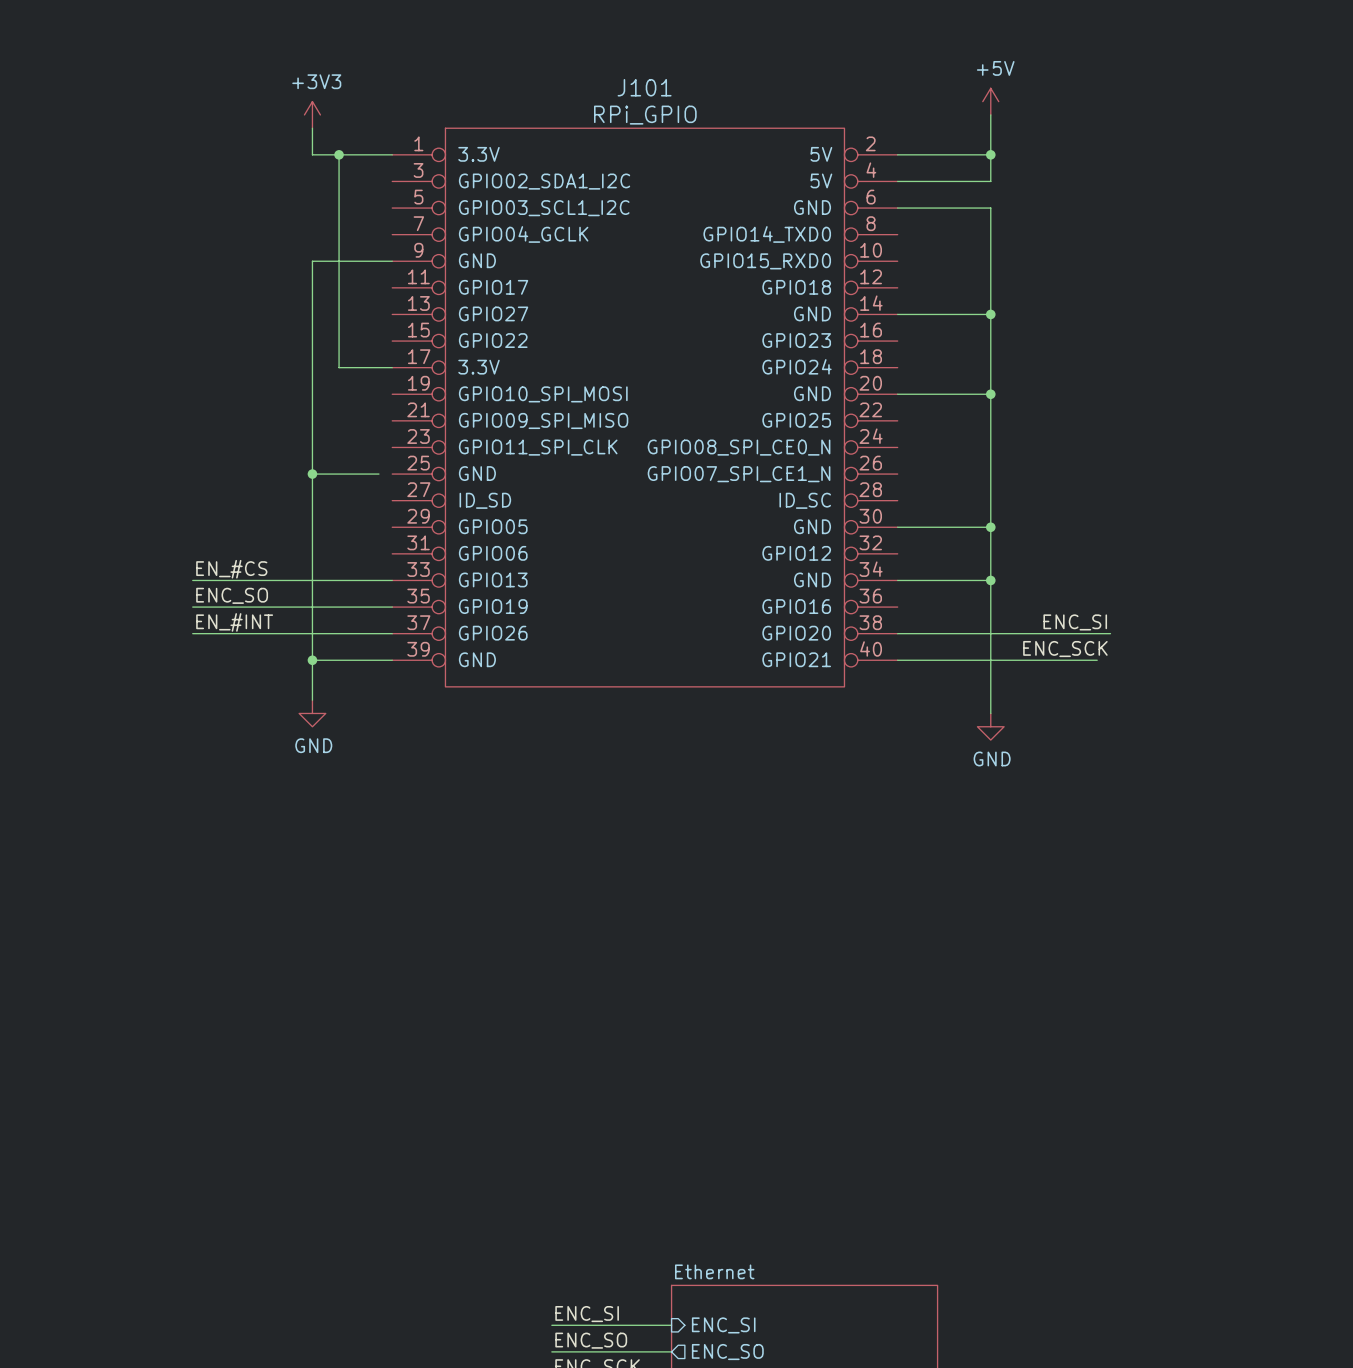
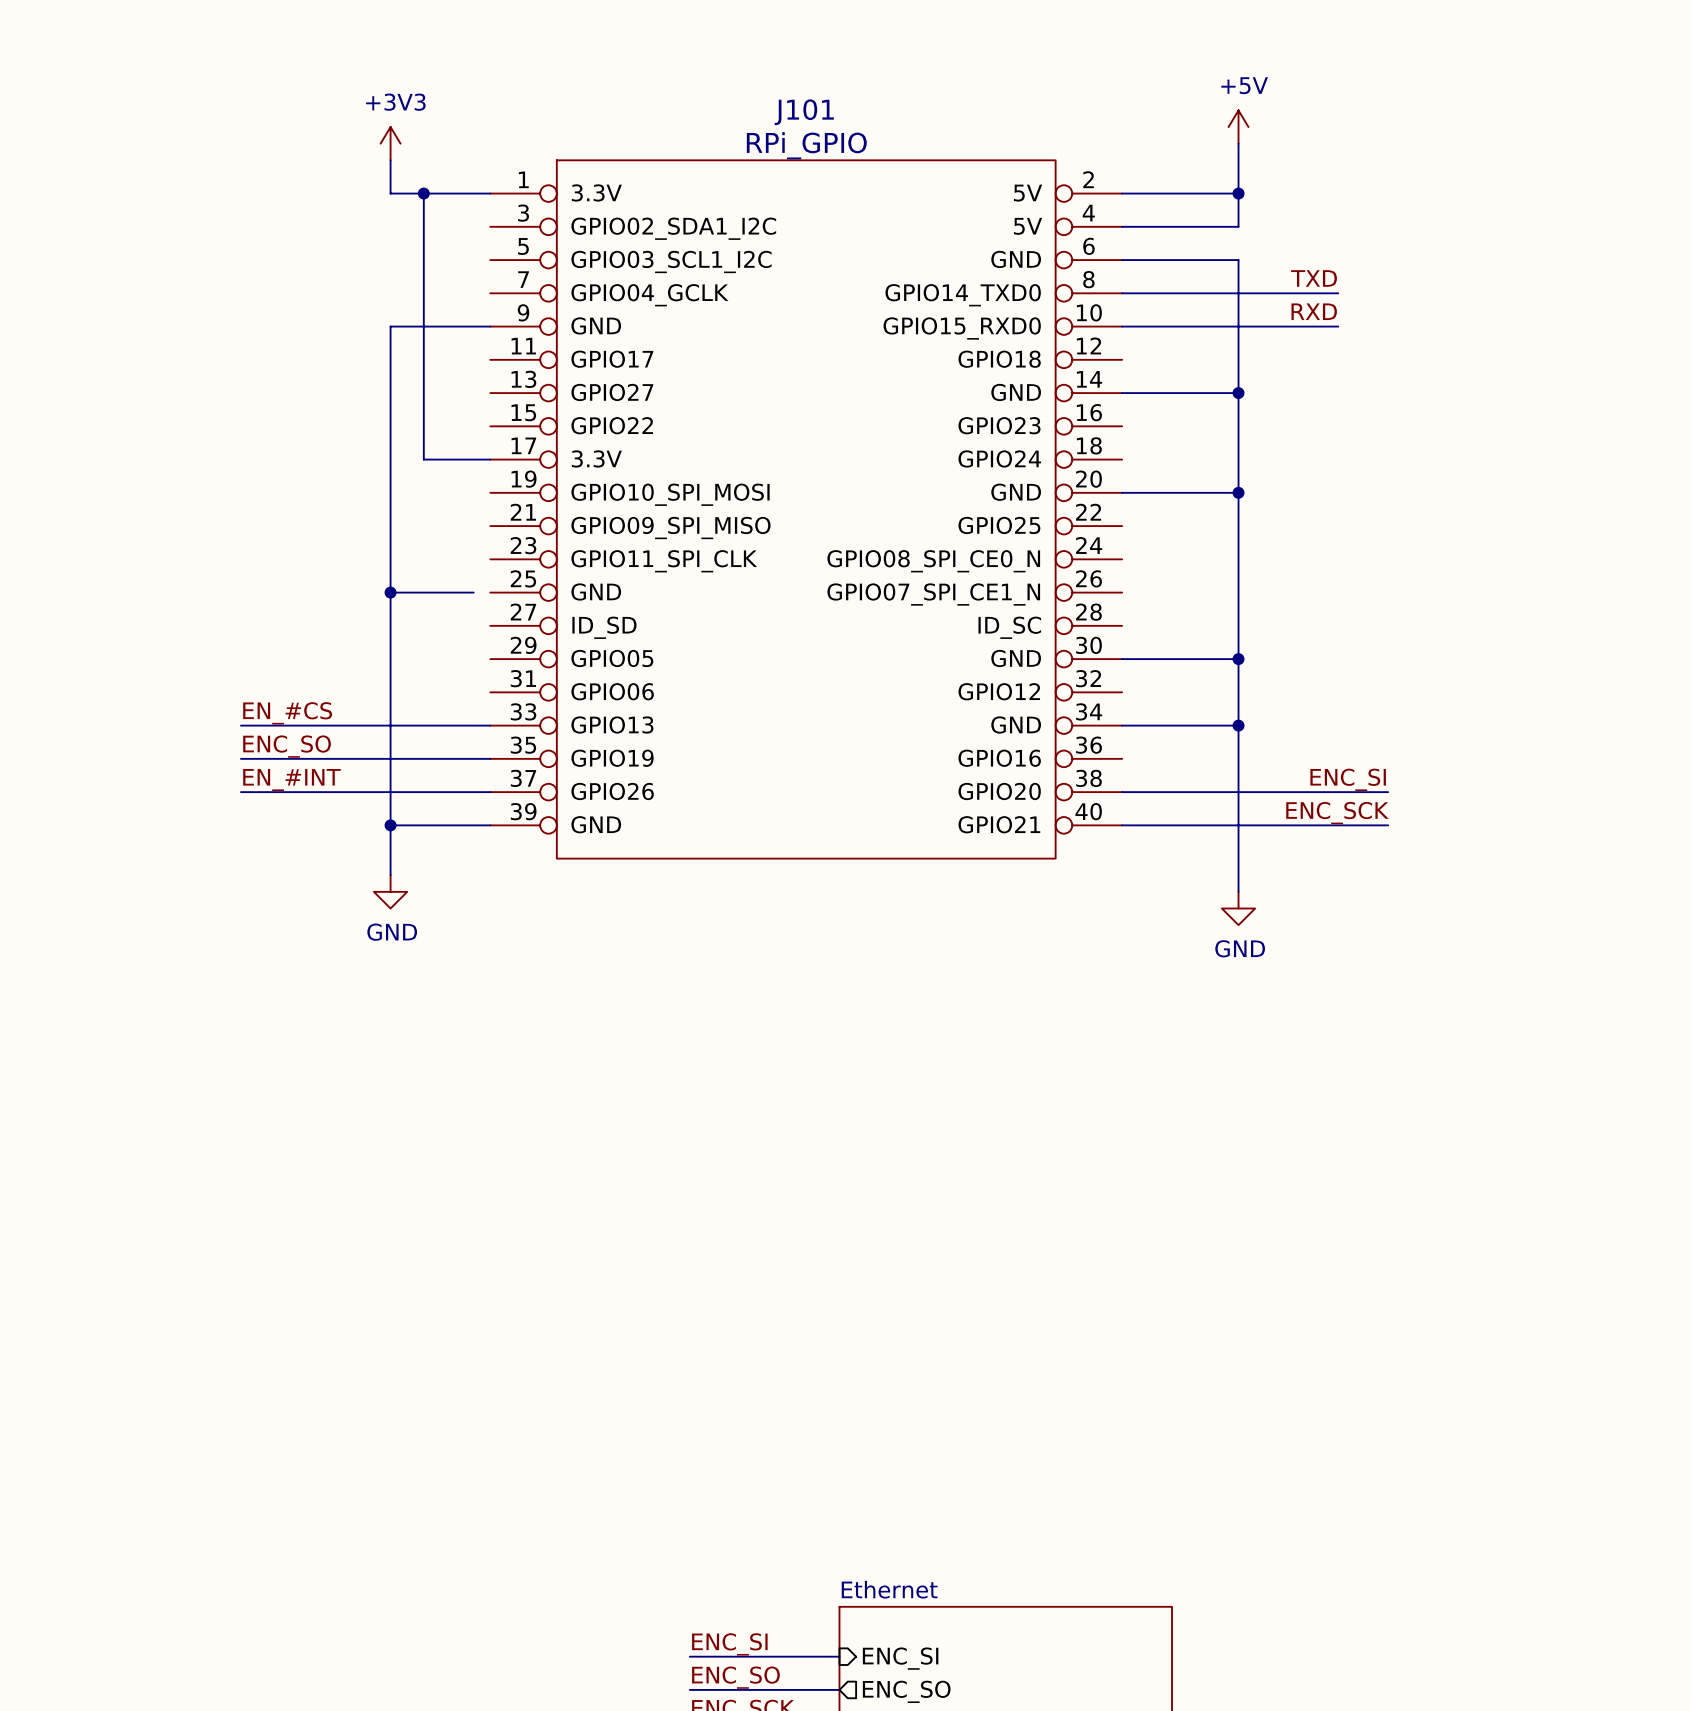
label: none -> TXD (1314, 278)
wire: none -> (1122, 293) (1338, 293)
label: none -> RXD (1314, 311)
wire: none -> (1122, 326) (1338, 326)
wire: none -> (1371, 825) (1388, 825)

